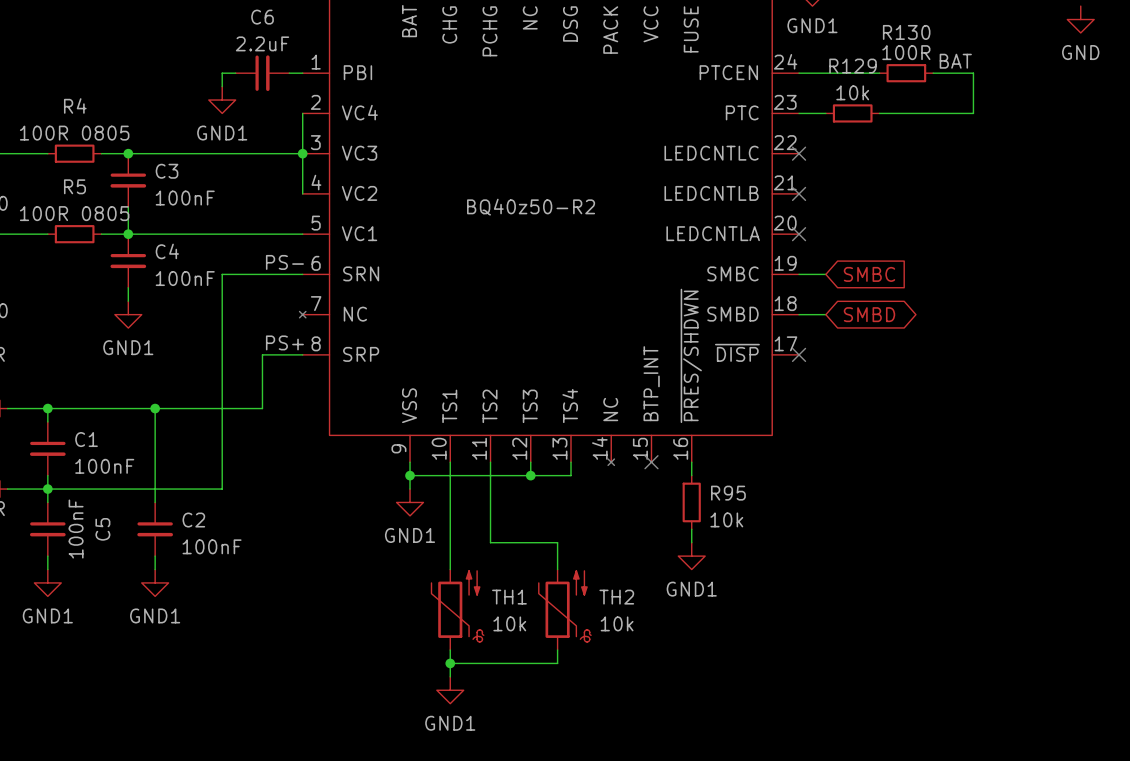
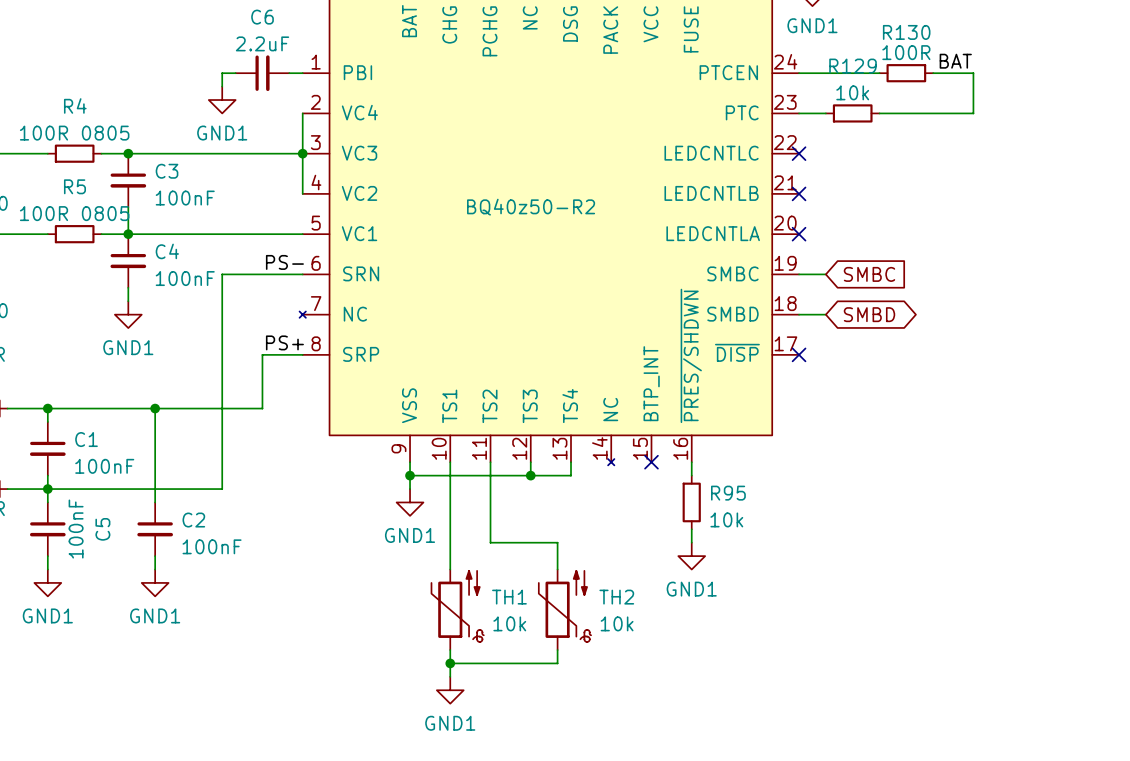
power symbol: GND (1080, 19) -> none

